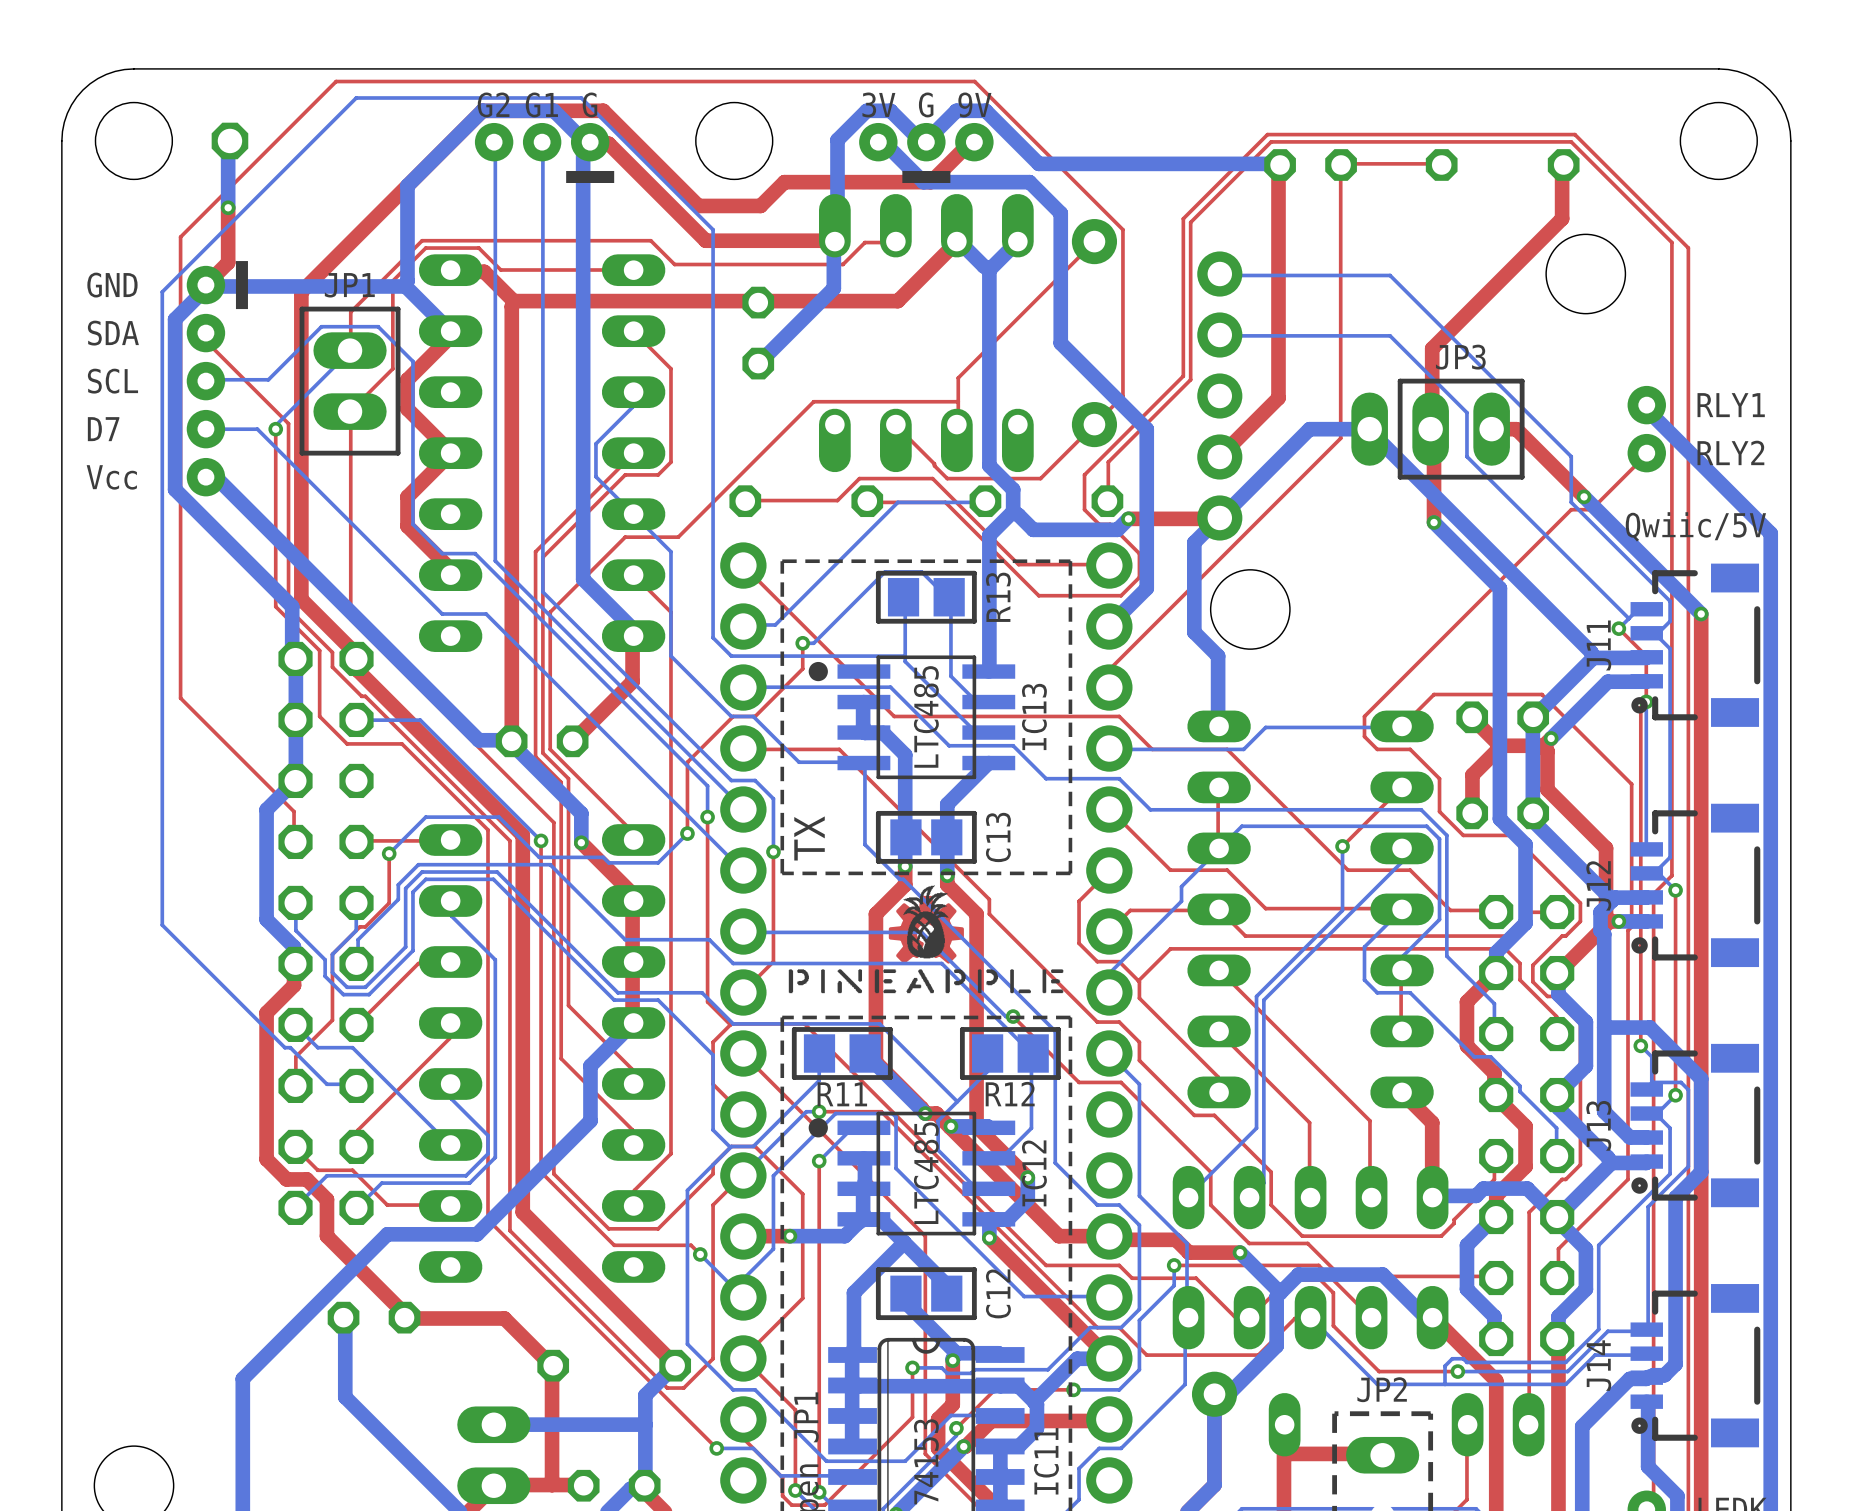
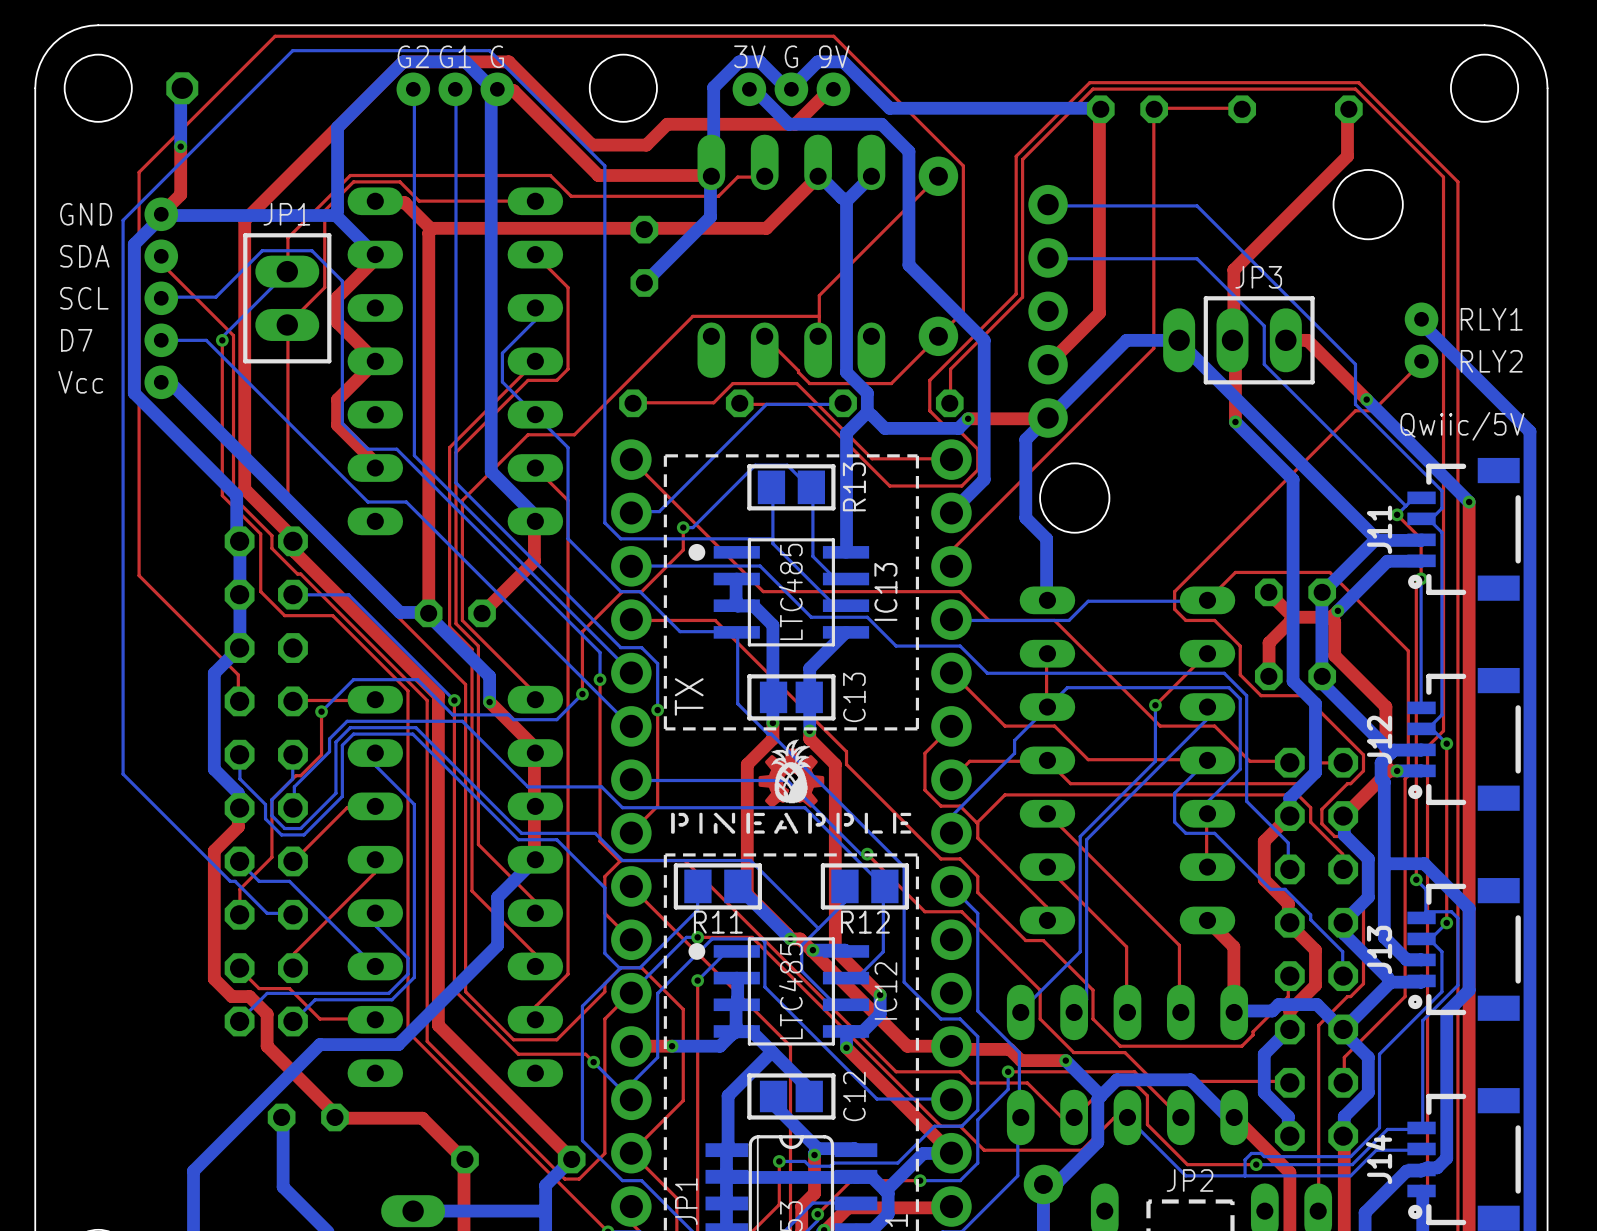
drawing: [566, 170, 615, 183] -> none
drawing: [902, 170, 951, 183] -> none
drawing: [235, 261, 248, 310] -> none

